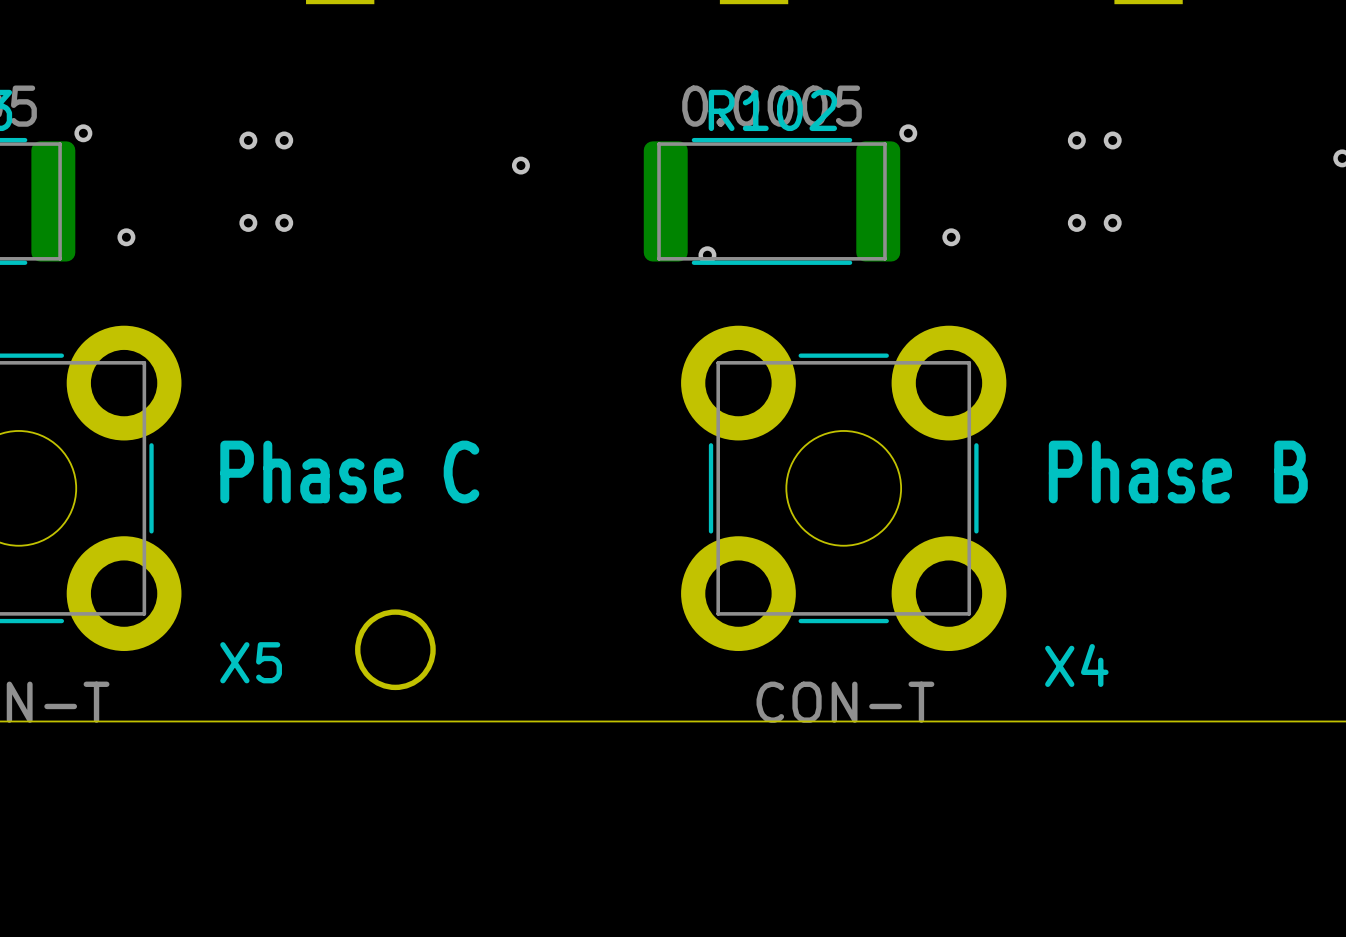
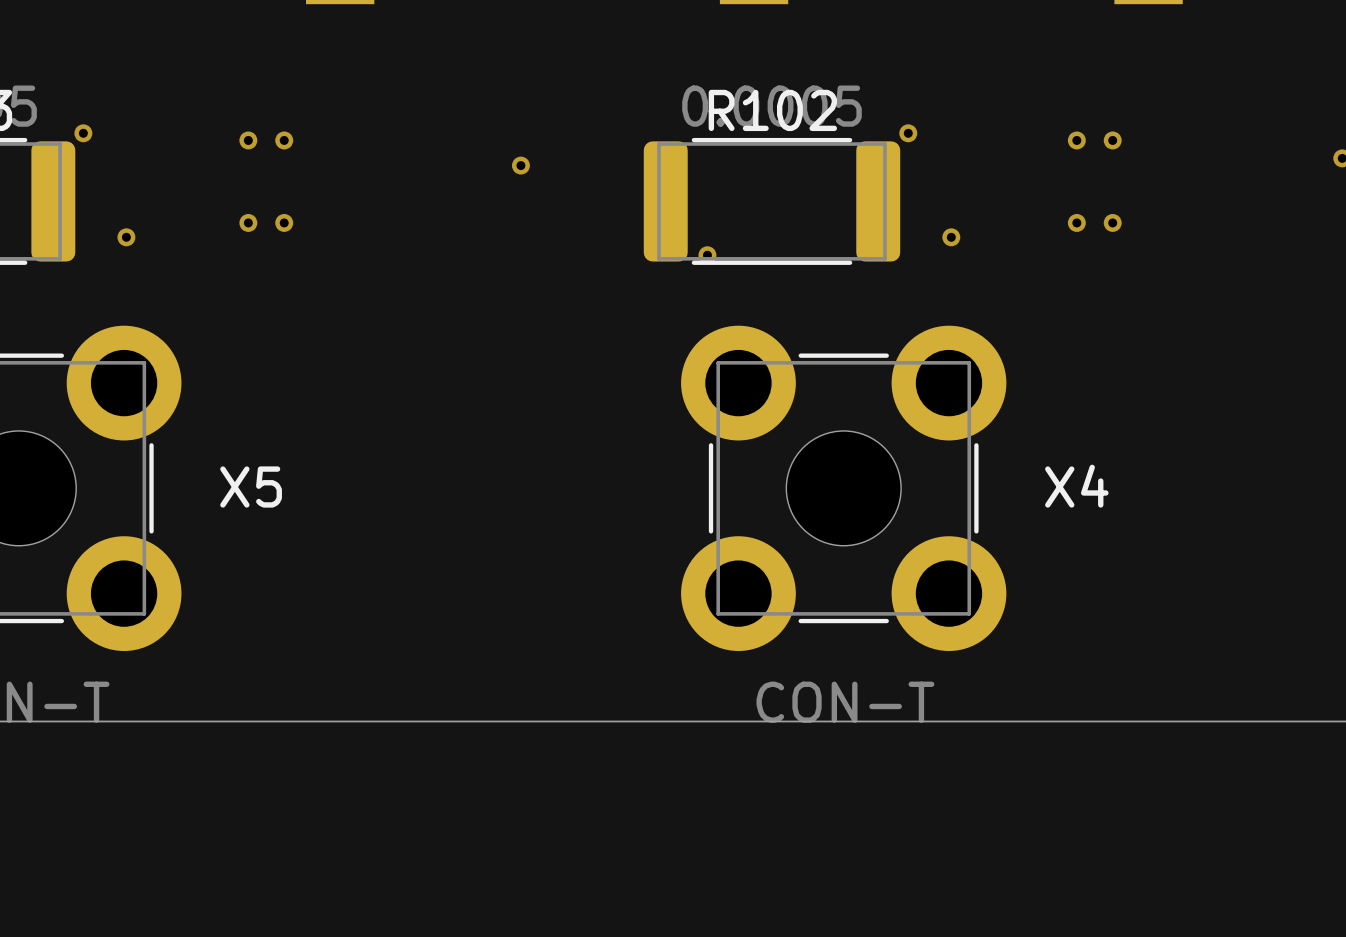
text: Phase C (349, 472) -> none
text: Phase B (1178, 472) -> none
round board edge: [355, 609, 436, 691] -> none
X5 name position: X5 (251, 662) -> X5 (251, 487)
X4 name position: X4 (1076, 665) -> X4 (1076, 486)

